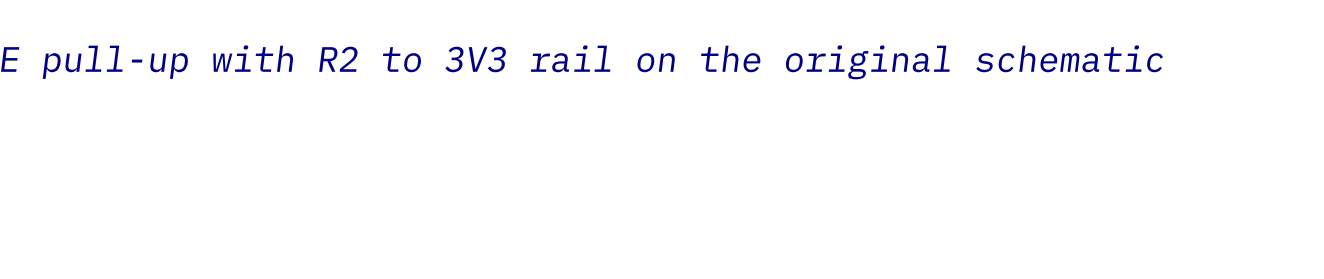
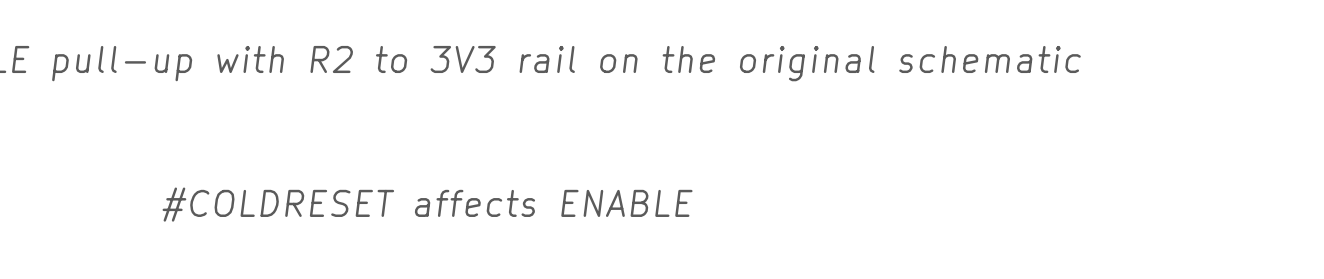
text: none -> #COLDRESET affects ENABLE (427, 204)

